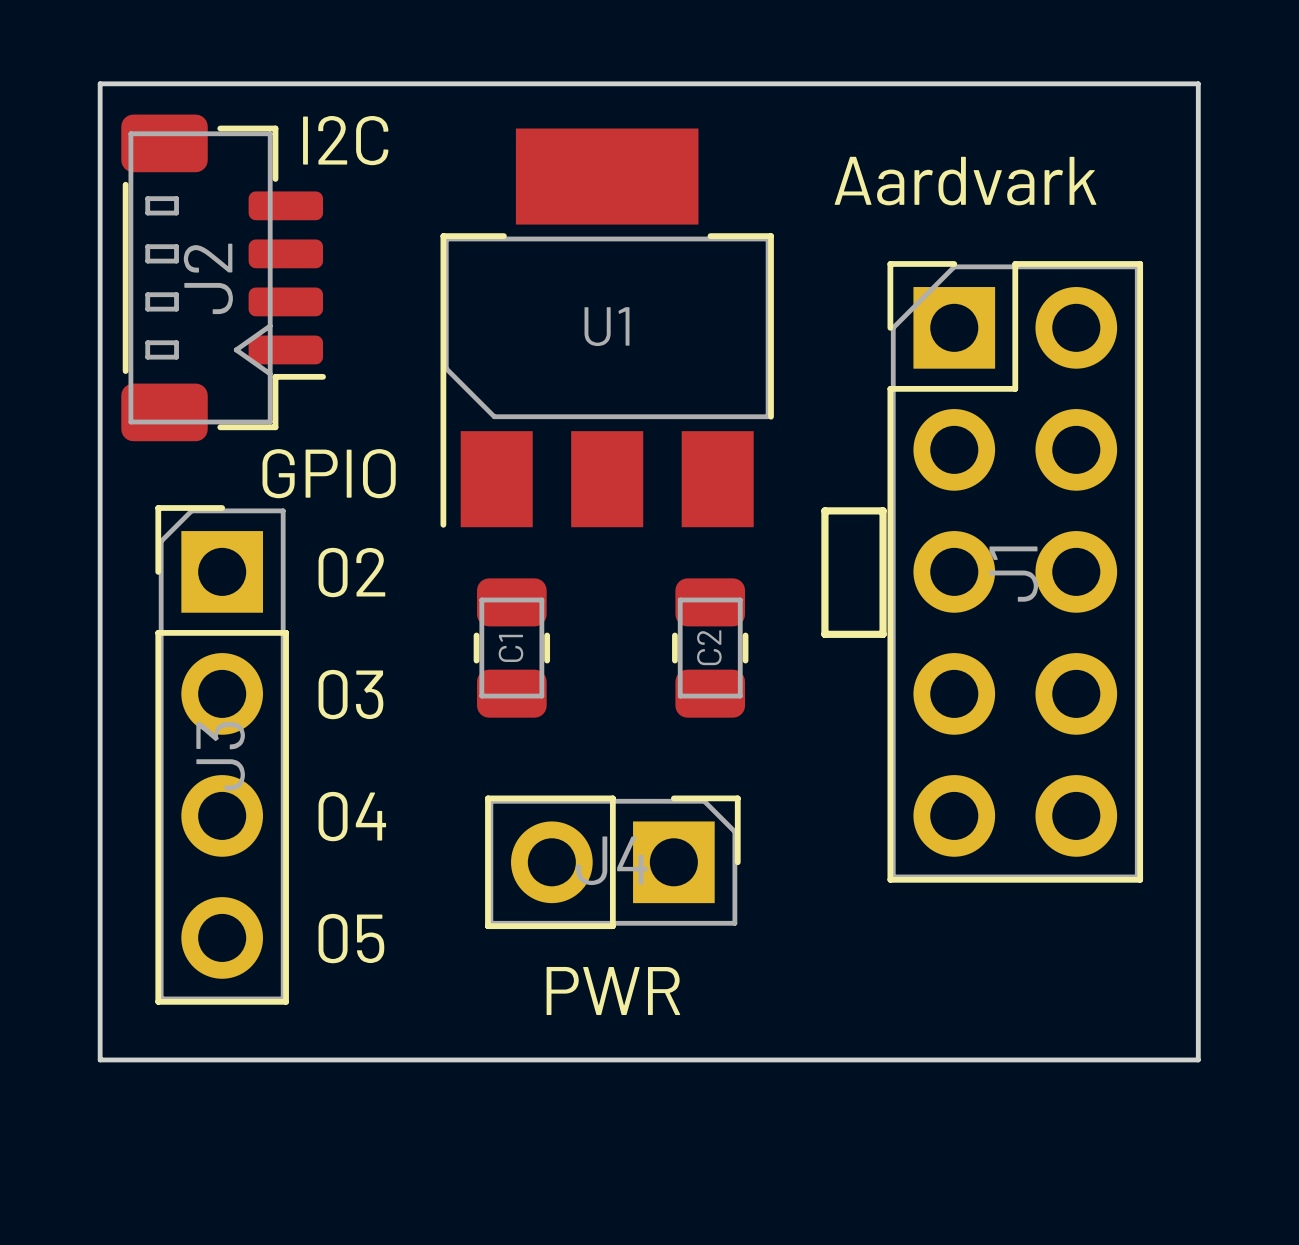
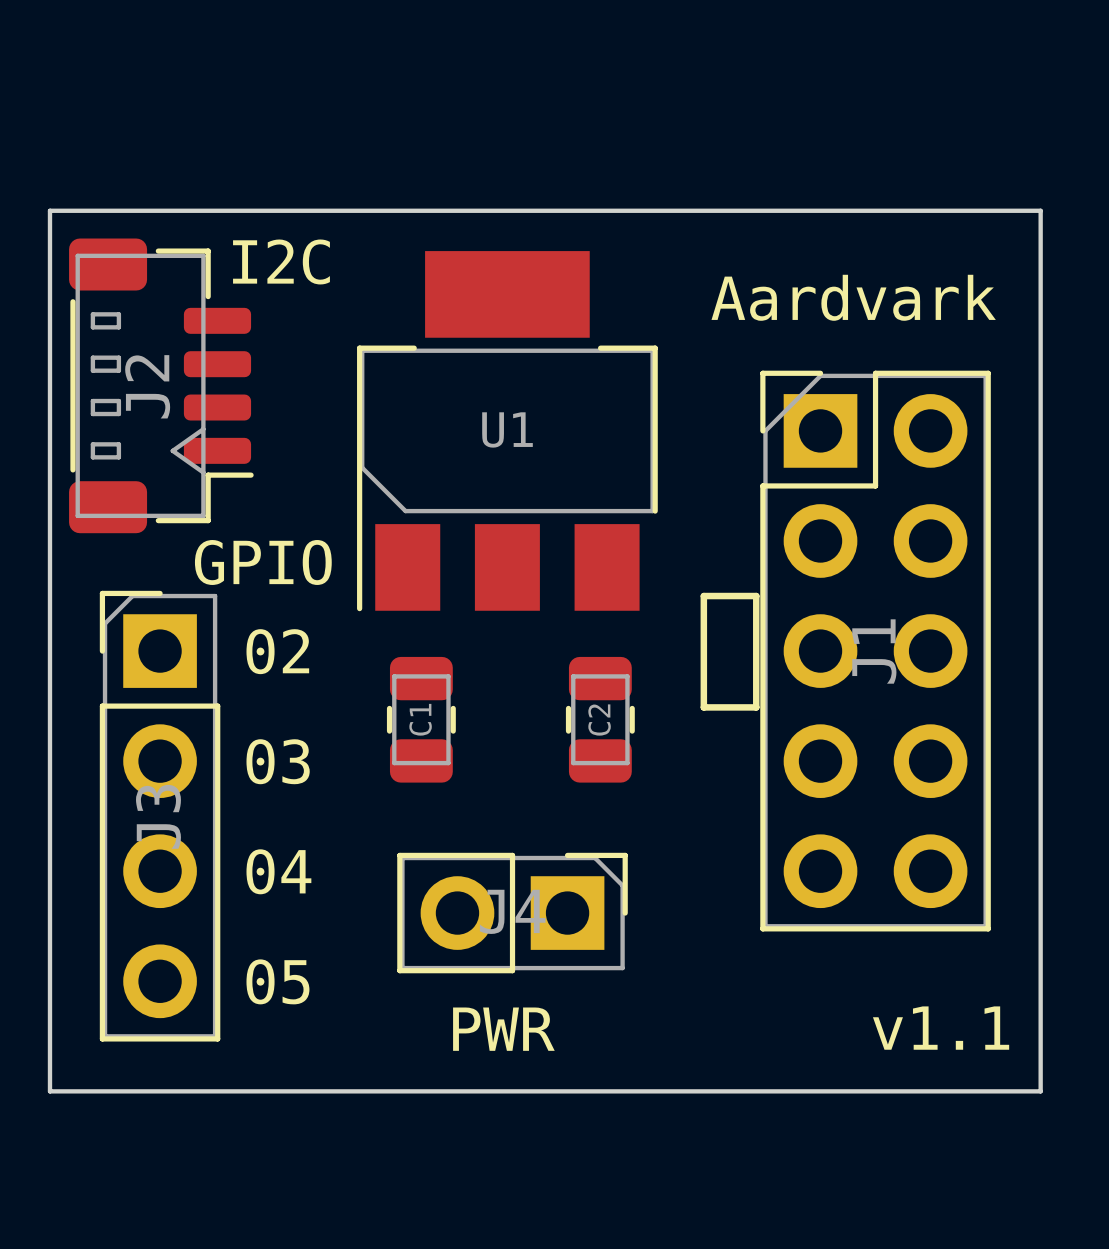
text: none -> v1.1 (941, 1028)

